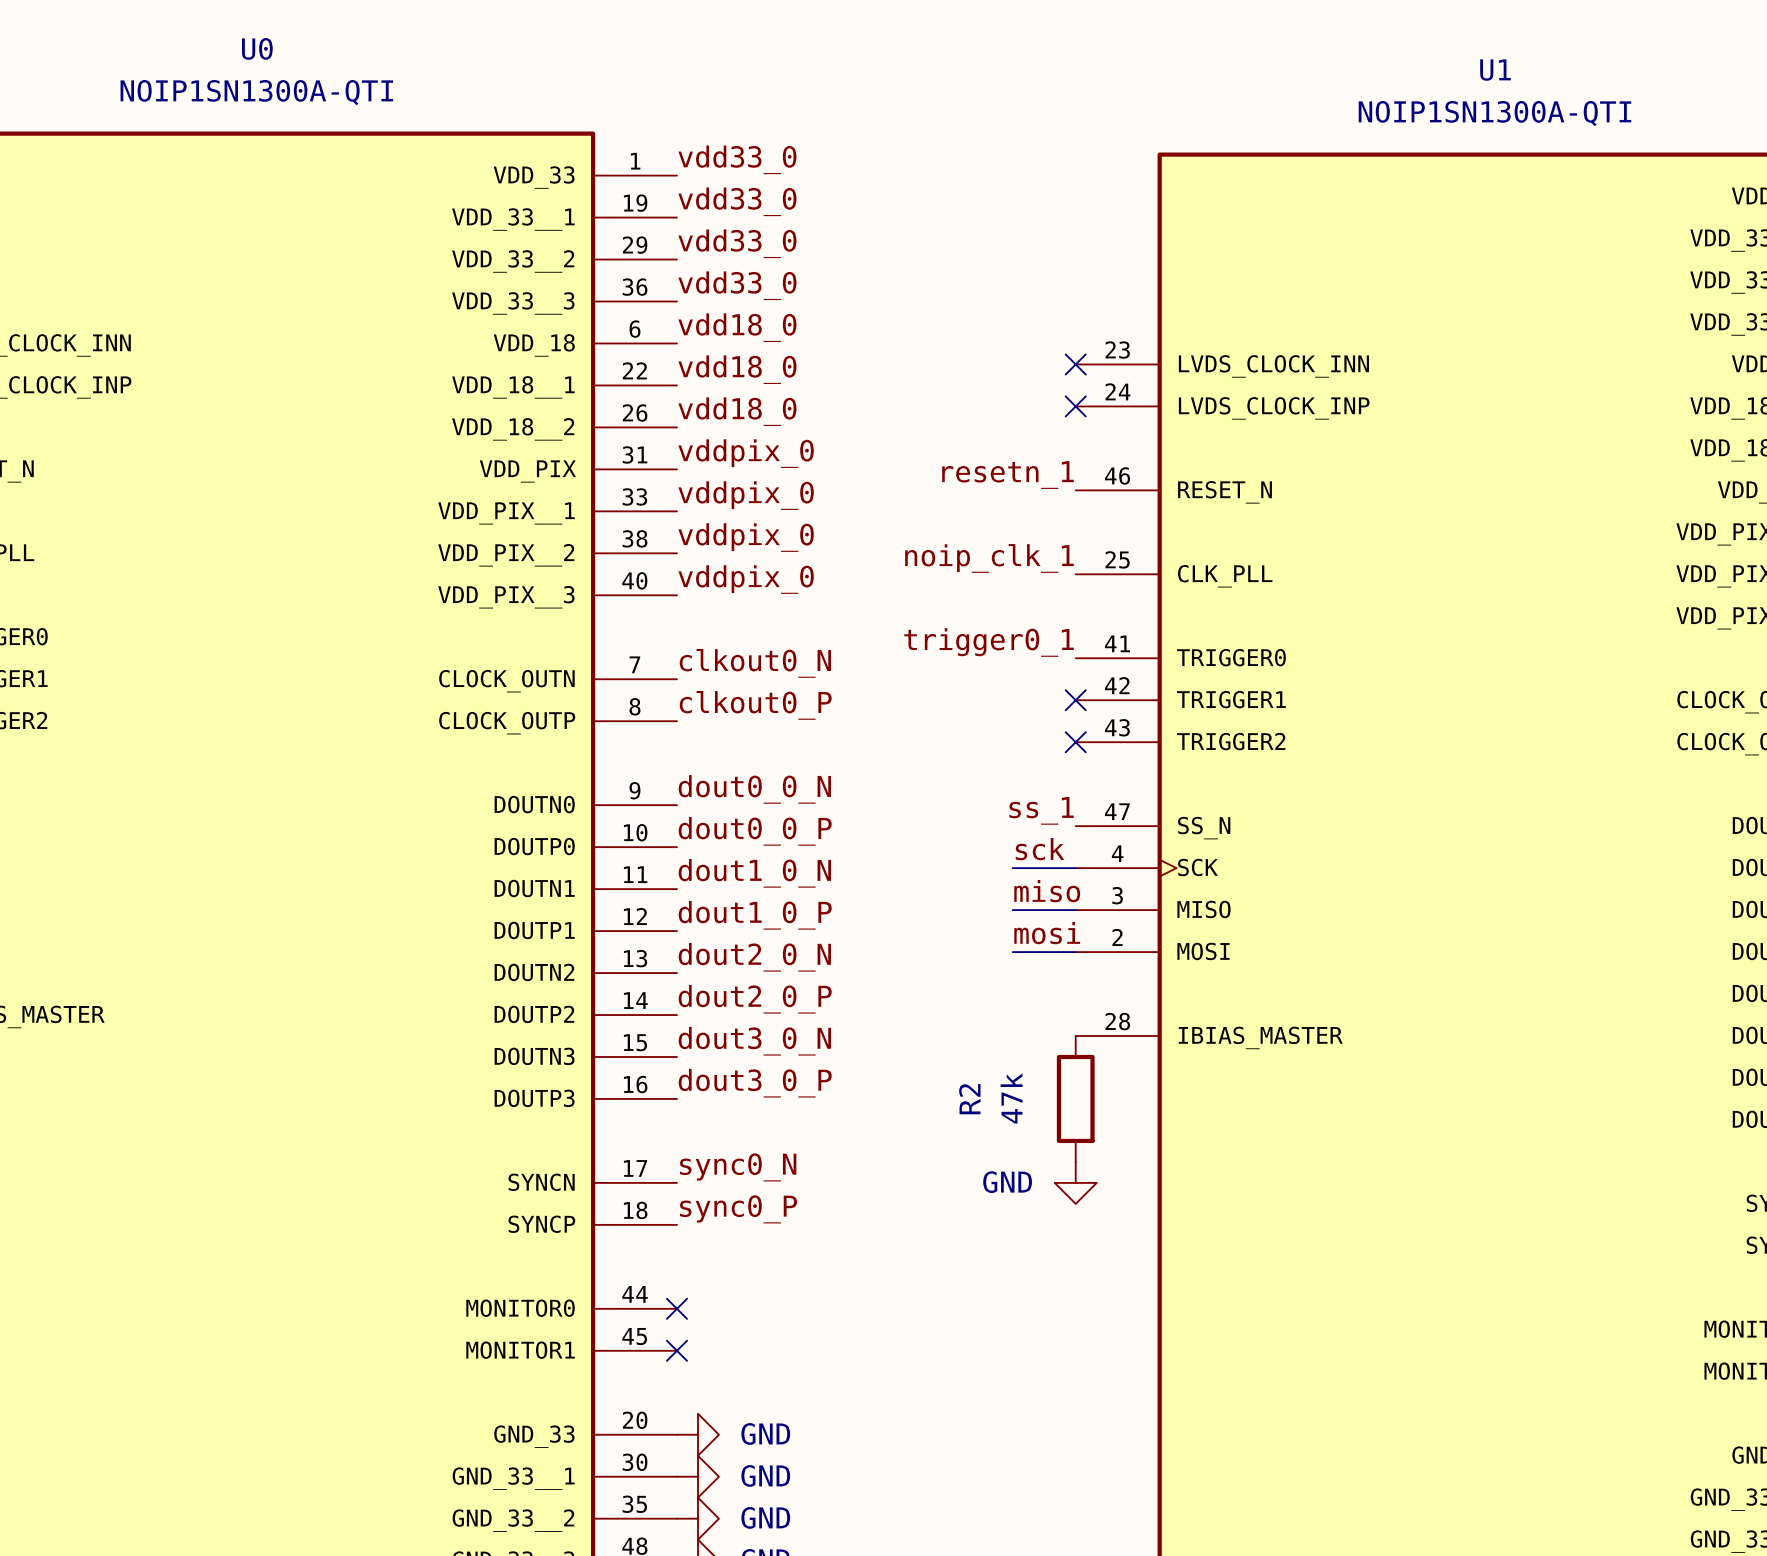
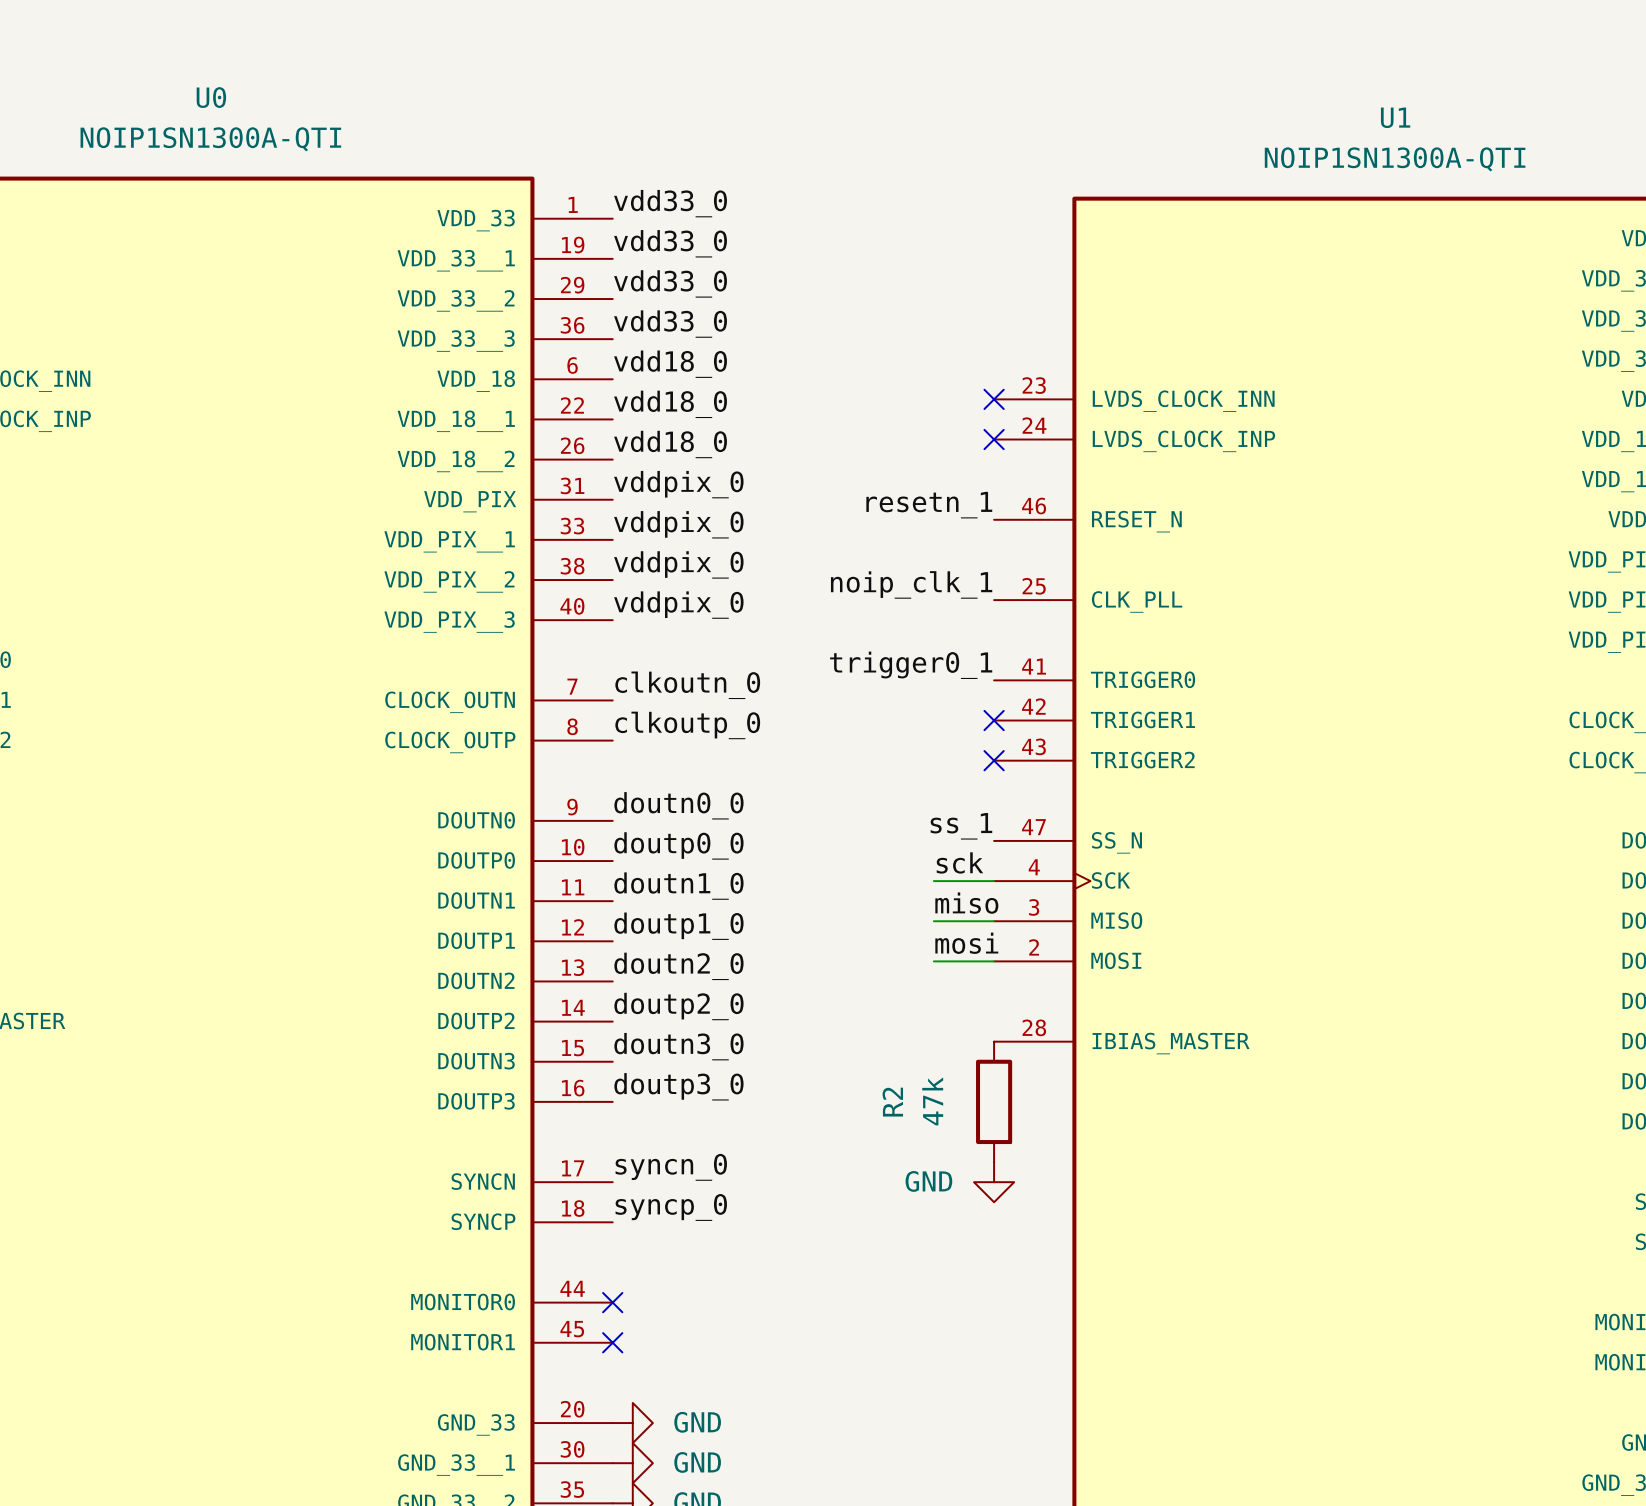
label: clkout0_N (755, 663) -> clkoutn_0 (687, 685)
label: clkout0_P (755, 705) -> clkoutp_0 (687, 725)
label: dout0_0_N (754, 789) -> doutn0_0 (678, 805)
label: dout0_0_P (755, 831) -> doutp0_0 (678, 845)
label: dout1_0_N (754, 873) -> doutn1_0 (678, 886)
label: dout1_0_P (755, 915) -> doutp1_0 (678, 926)
label: dout2_0_N (754, 957) -> doutn2_0 (678, 966)
label: dout2_0_P (755, 999) -> doutp2_0 (678, 1006)
label: dout3_0_N (754, 1041) -> doutn3_0 (678, 1046)
label: dout3_0_P (755, 1083) -> doutp3_0 (678, 1086)
label: sync0_N (738, 1167) -> syncn_0 (671, 1167)
label: sync0_P (738, 1209) -> syncp_0 (671, 1207)

